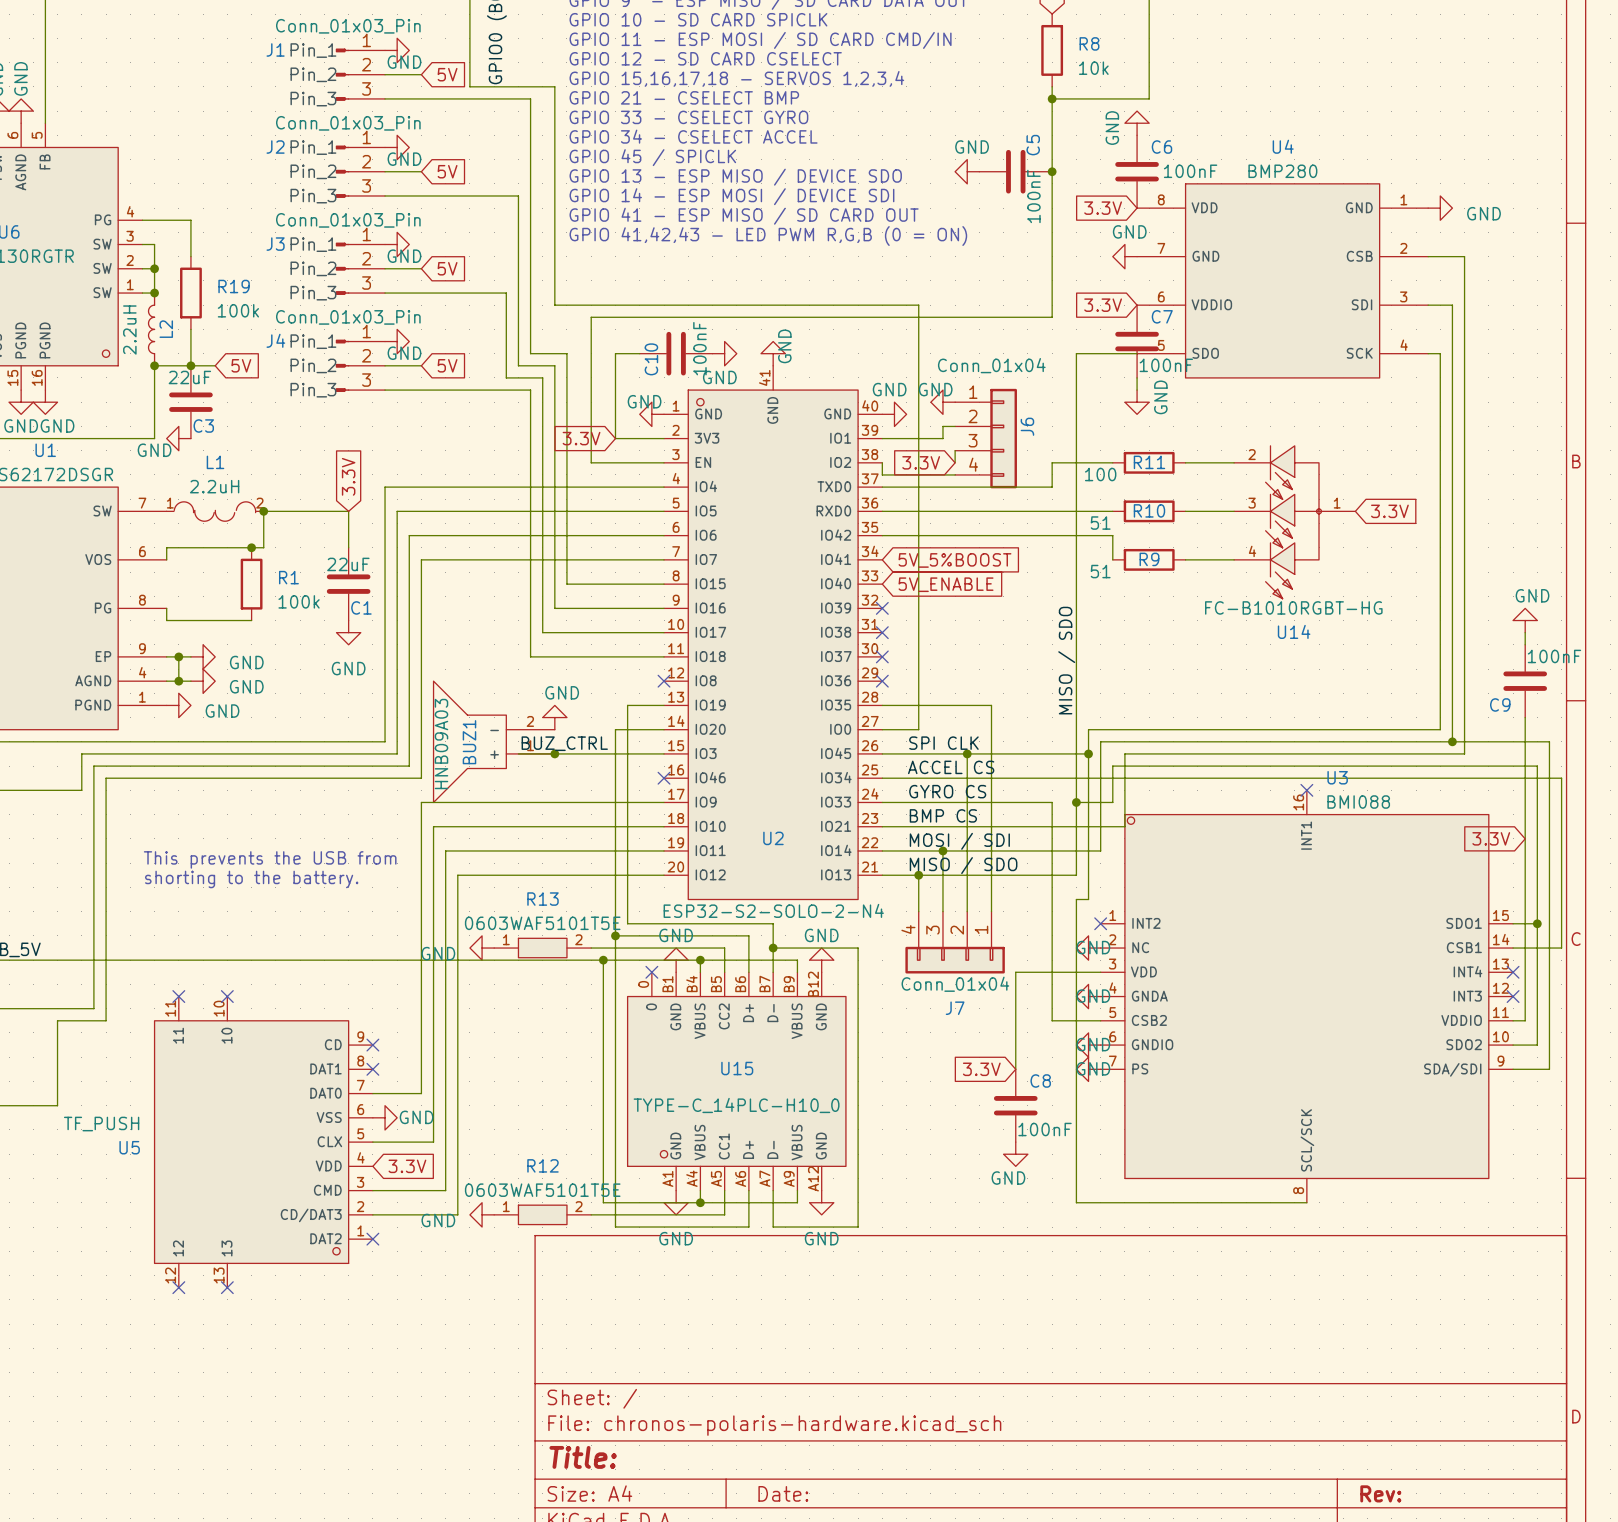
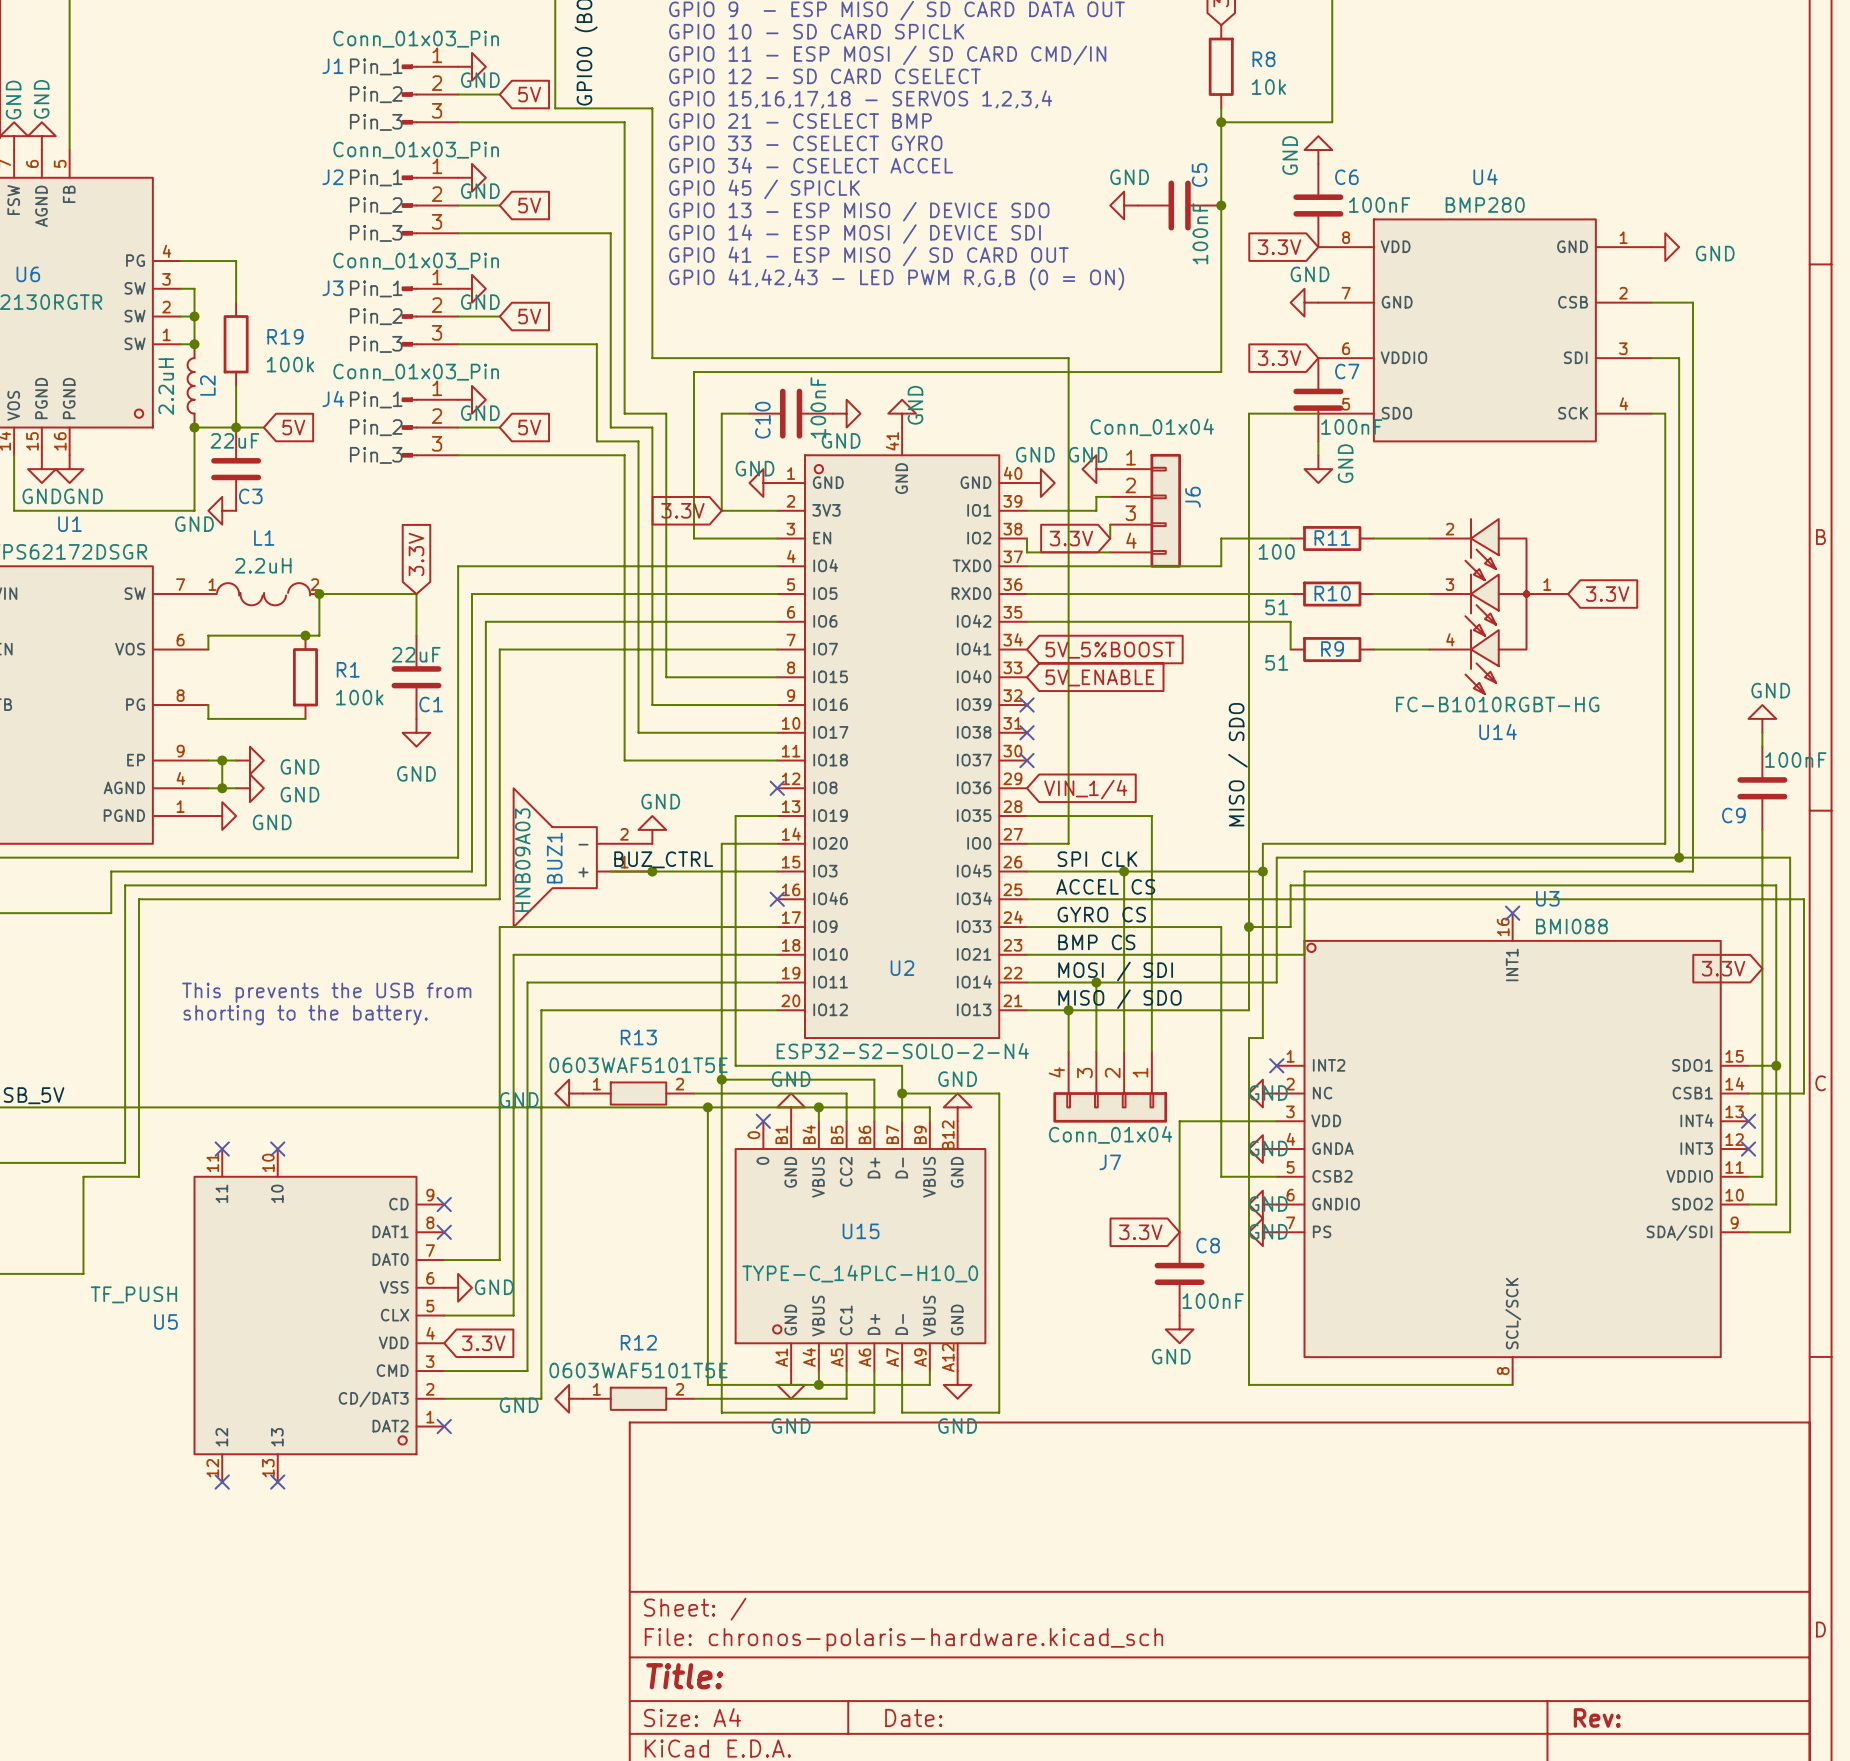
no-connect mark: (882, 681) -> none
global label: none -> VIN_1/4 (1085, 789)

